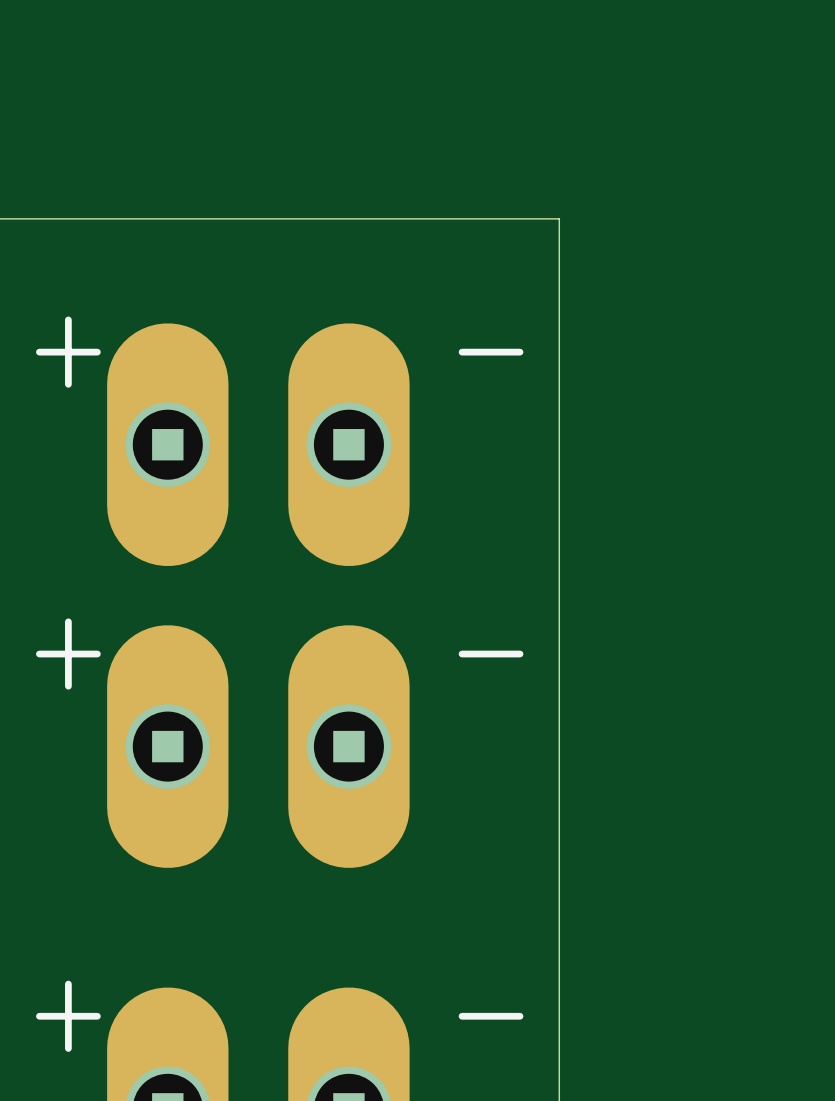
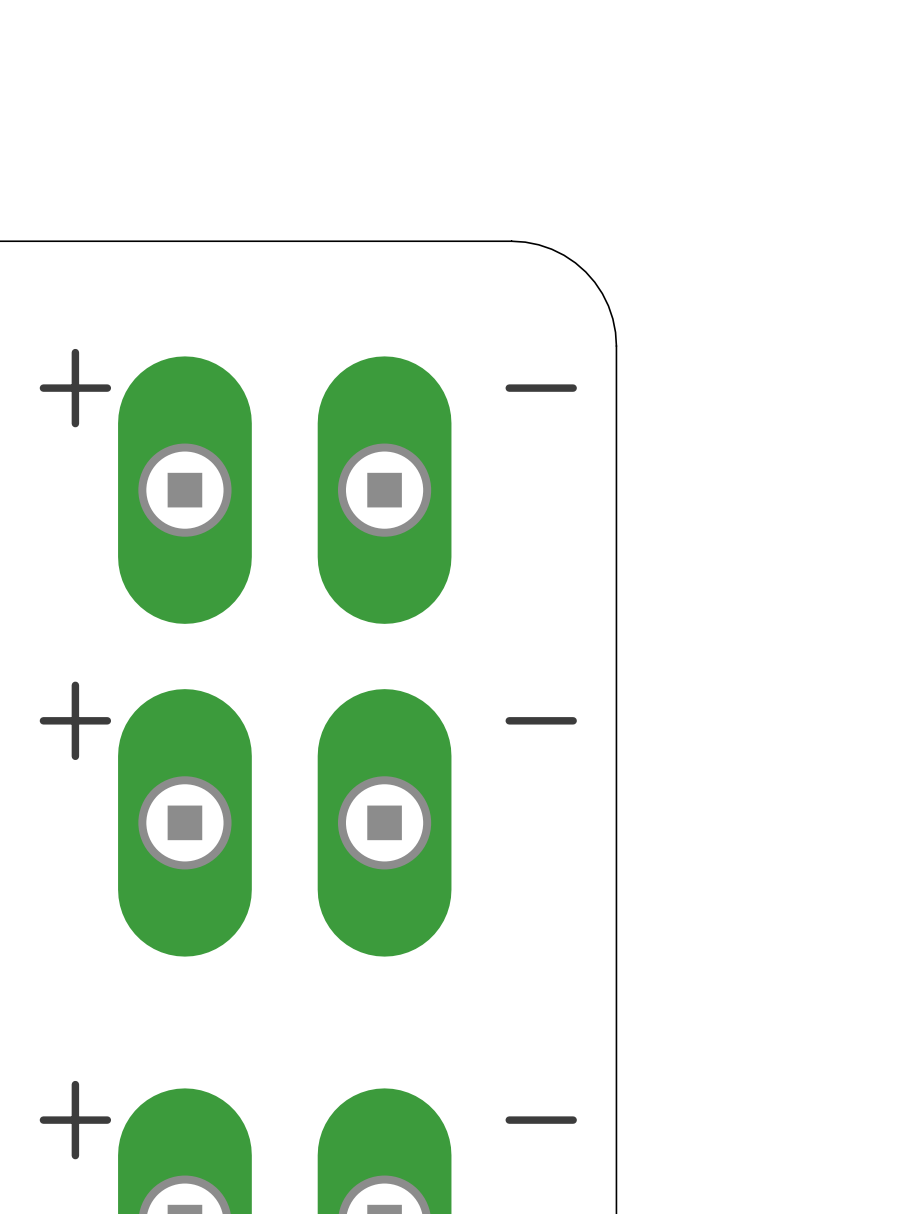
board edge: (464, 218) (559, 218) (559, 313) -> (511, 241) (538, 244) (551, 249) (564, 255) (585, 271) (602, 293) (608, 305) (612, 318) (616, 346)

